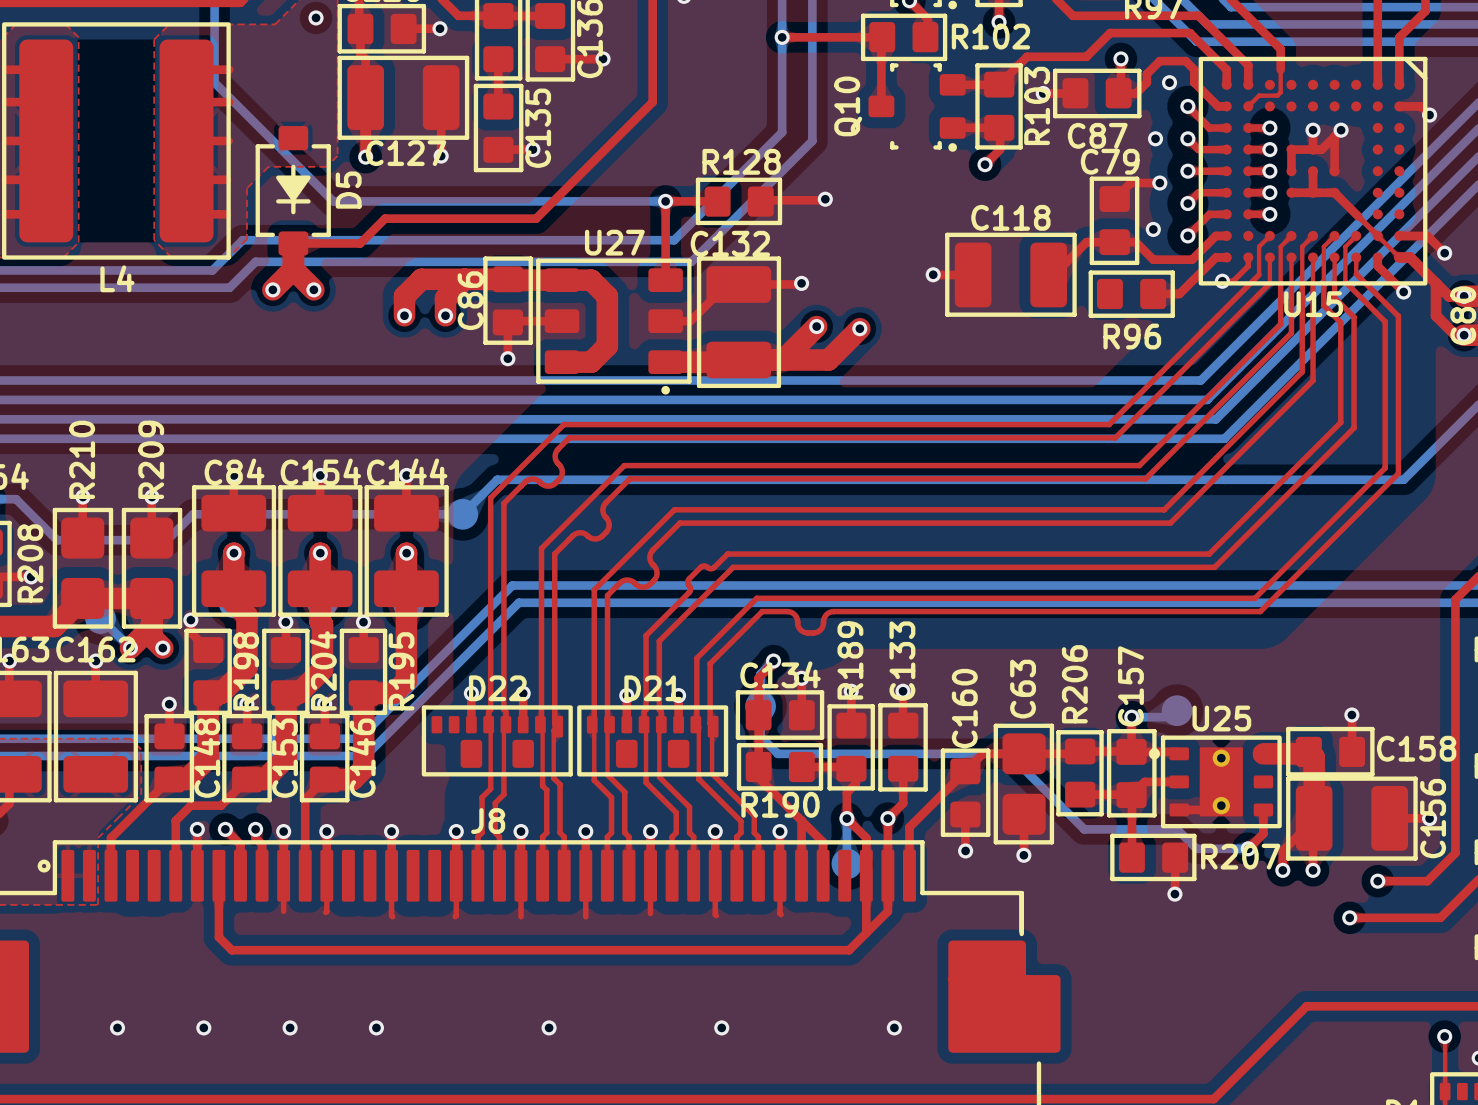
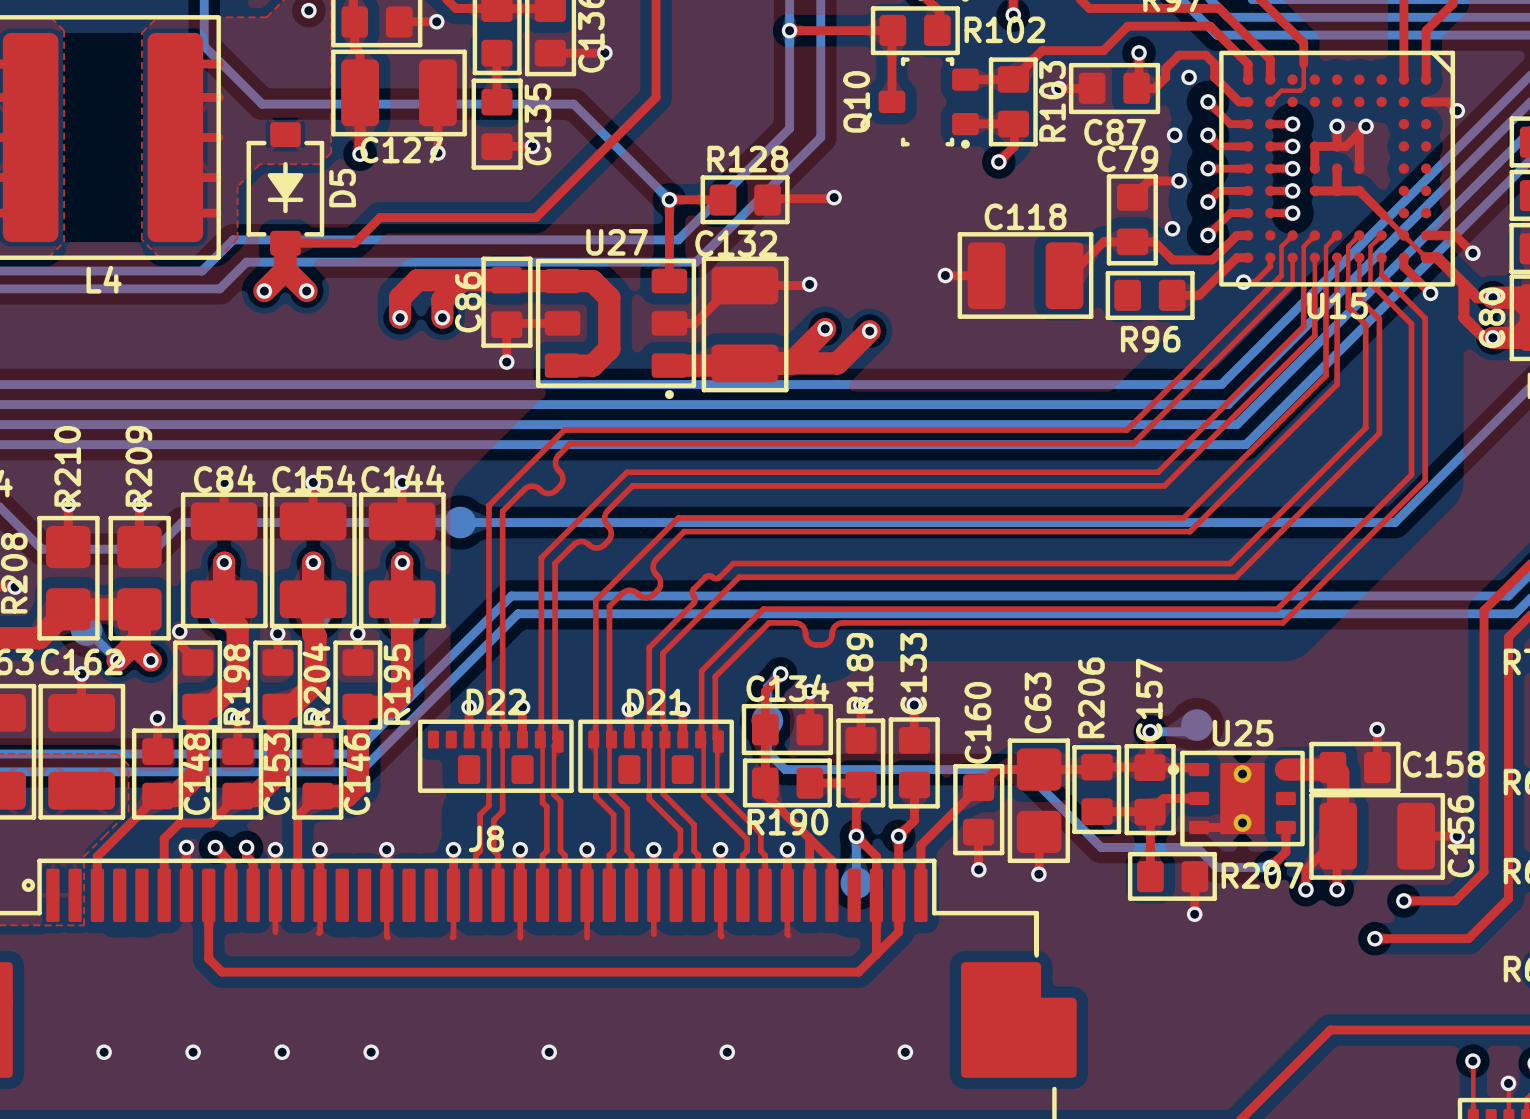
bottom track: (214, 52) (214, 82) (333, 201) (665, 201) -> (204, 46) (262, 104) (573, 104) (669, 199)
bottom track: (1403, 479) (497, 479) (462, 514) -> (1430, 486) (1394, 522) (460, 522)

